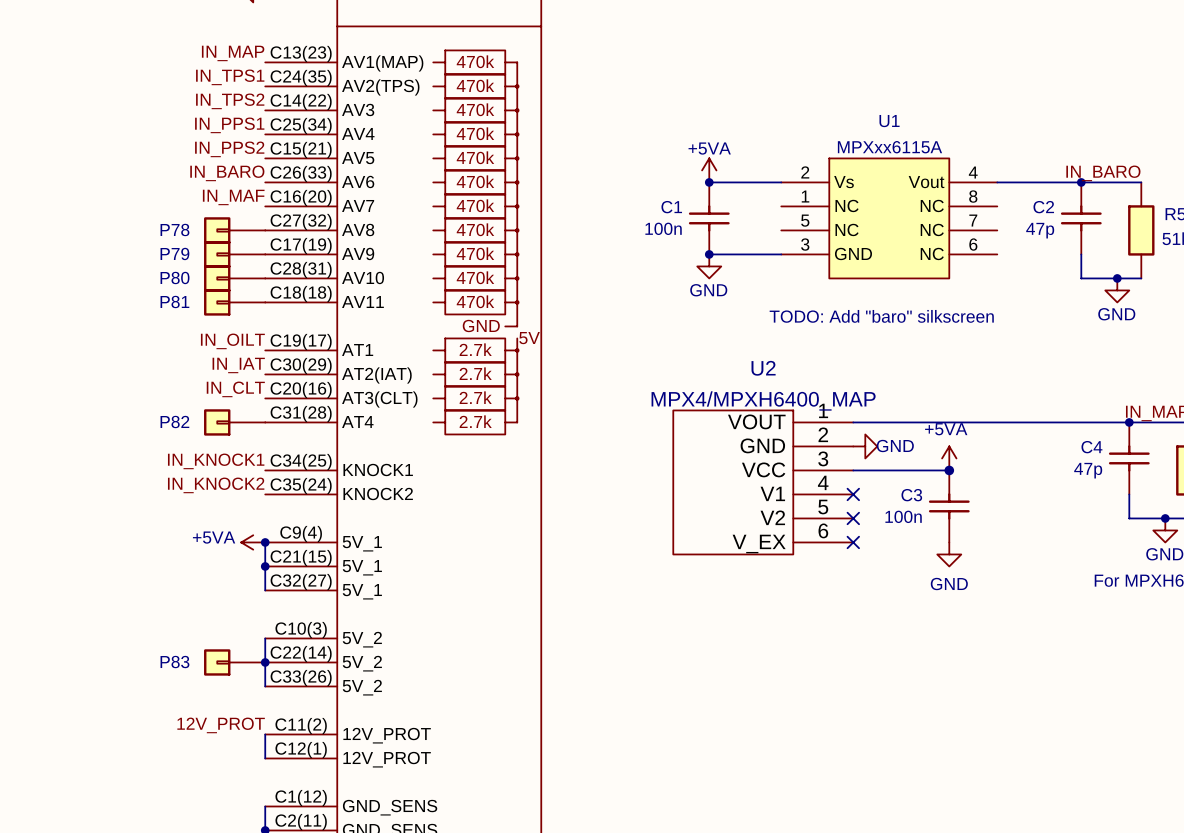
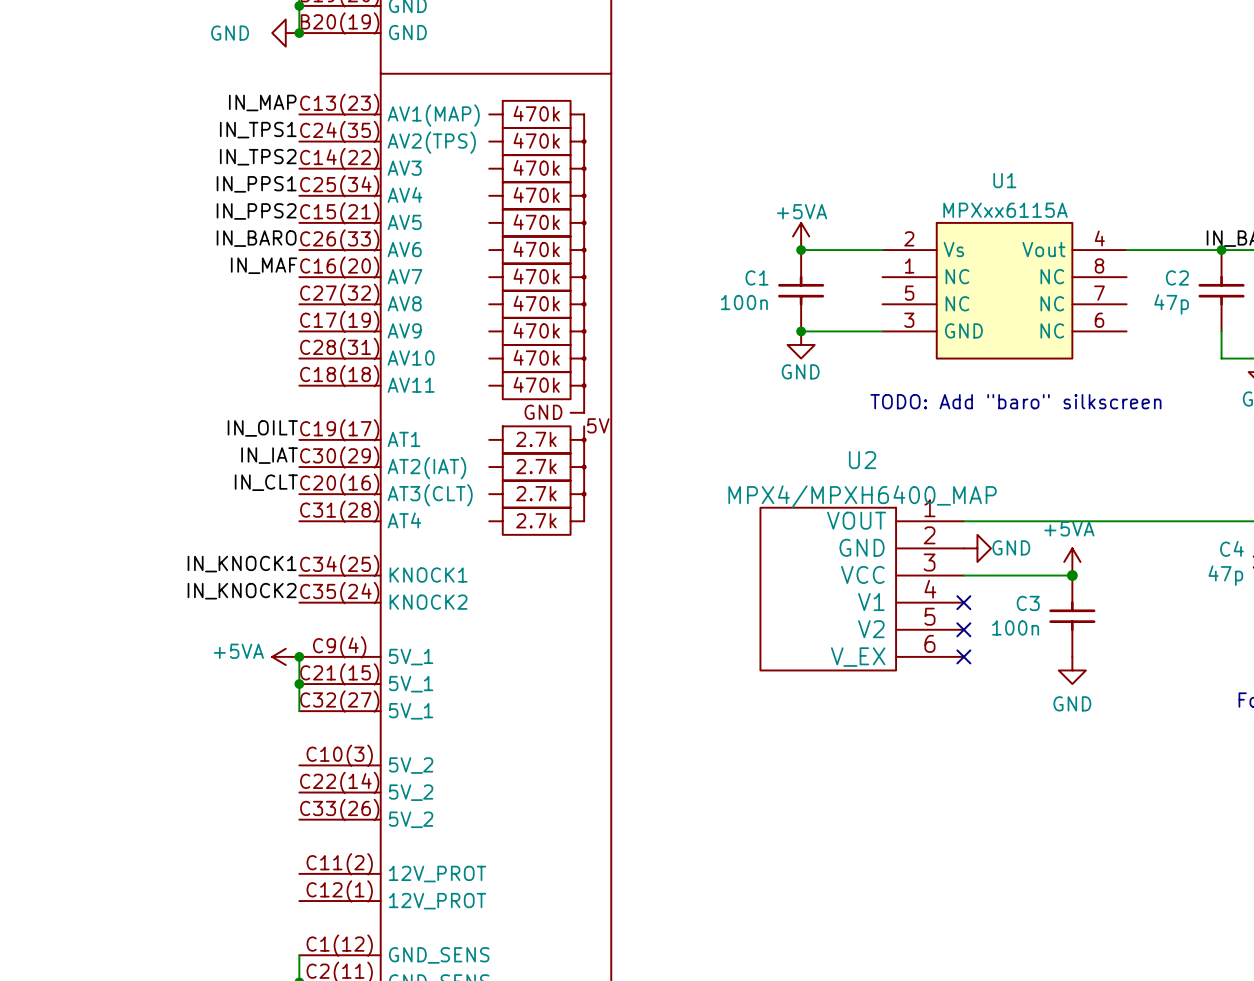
P78: (234, 230) -> none
P79: (234, 254) -> none
P80: (234, 278) -> none
P81: (234, 302) -> none
P82: (234, 422) -> none
wire: (265, 638) (265, 686) -> none
P83: (234, 662) -> none
junction: (265, 662) -> none
label: 12V_PROT (221, 725) -> none
wire: (265, 734) (265, 758) -> none

